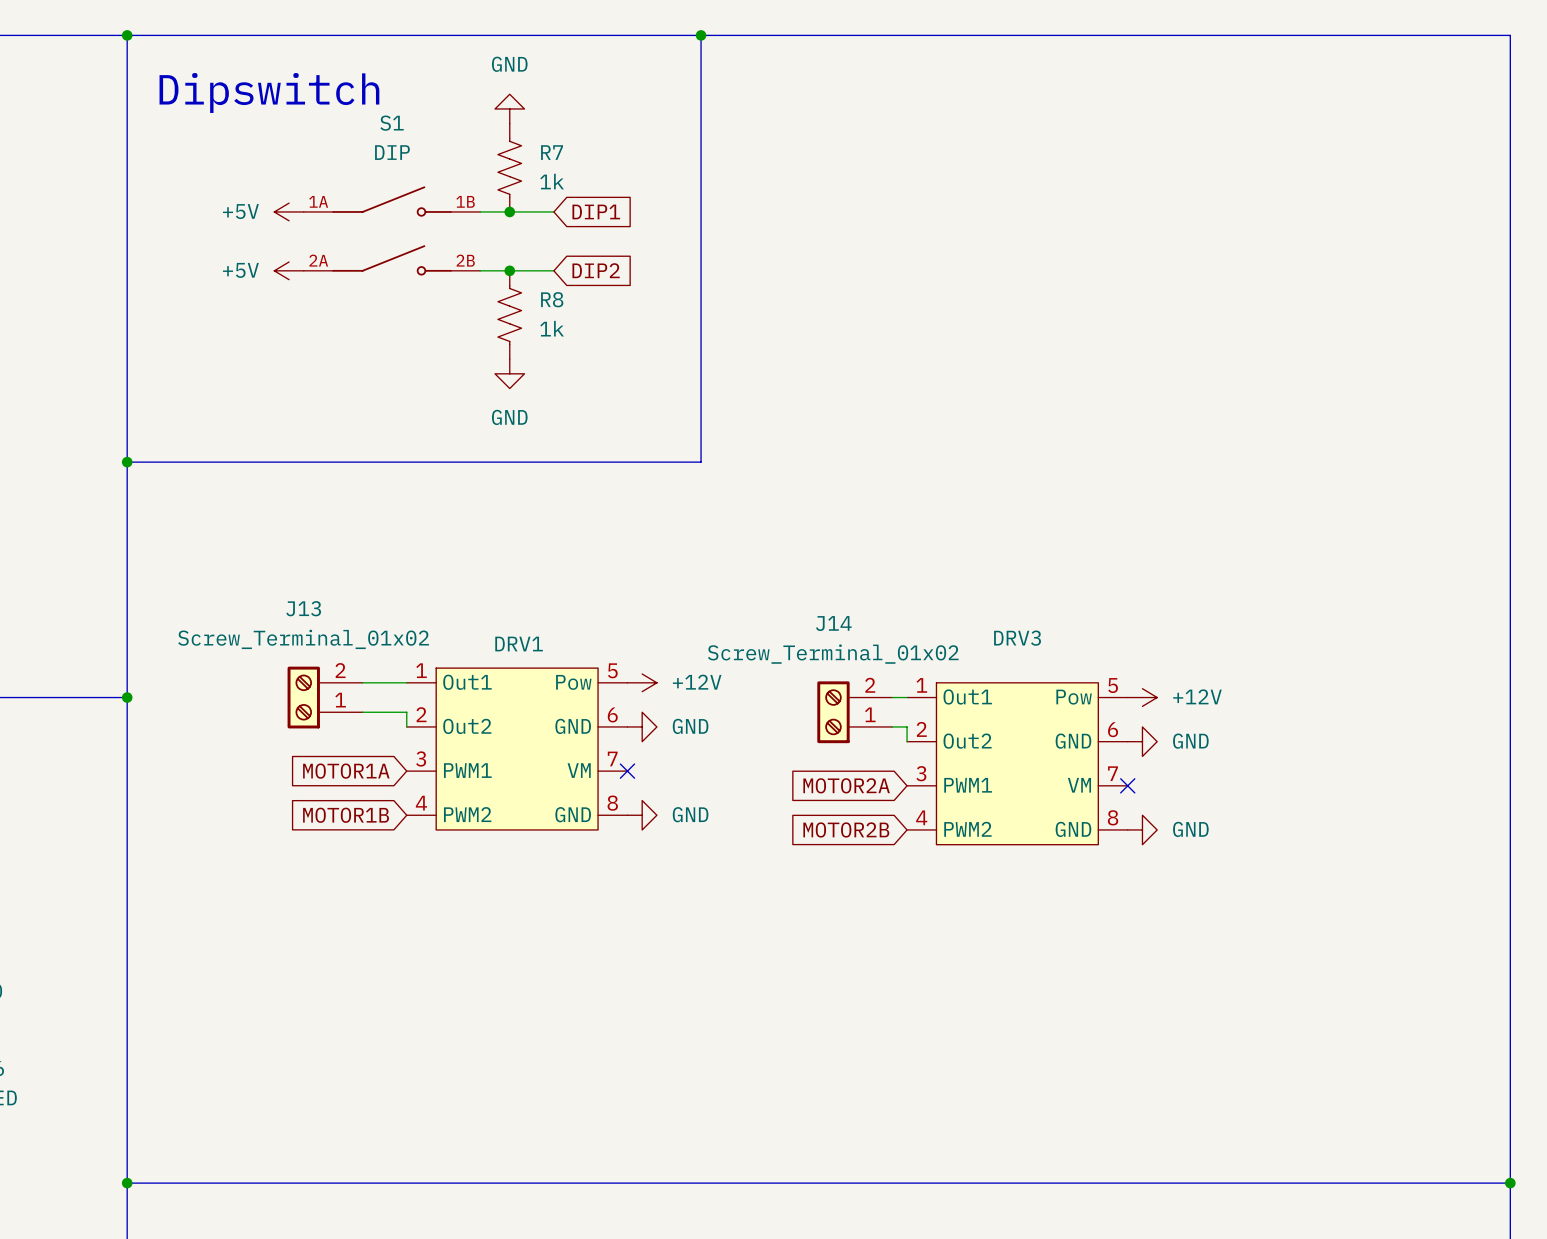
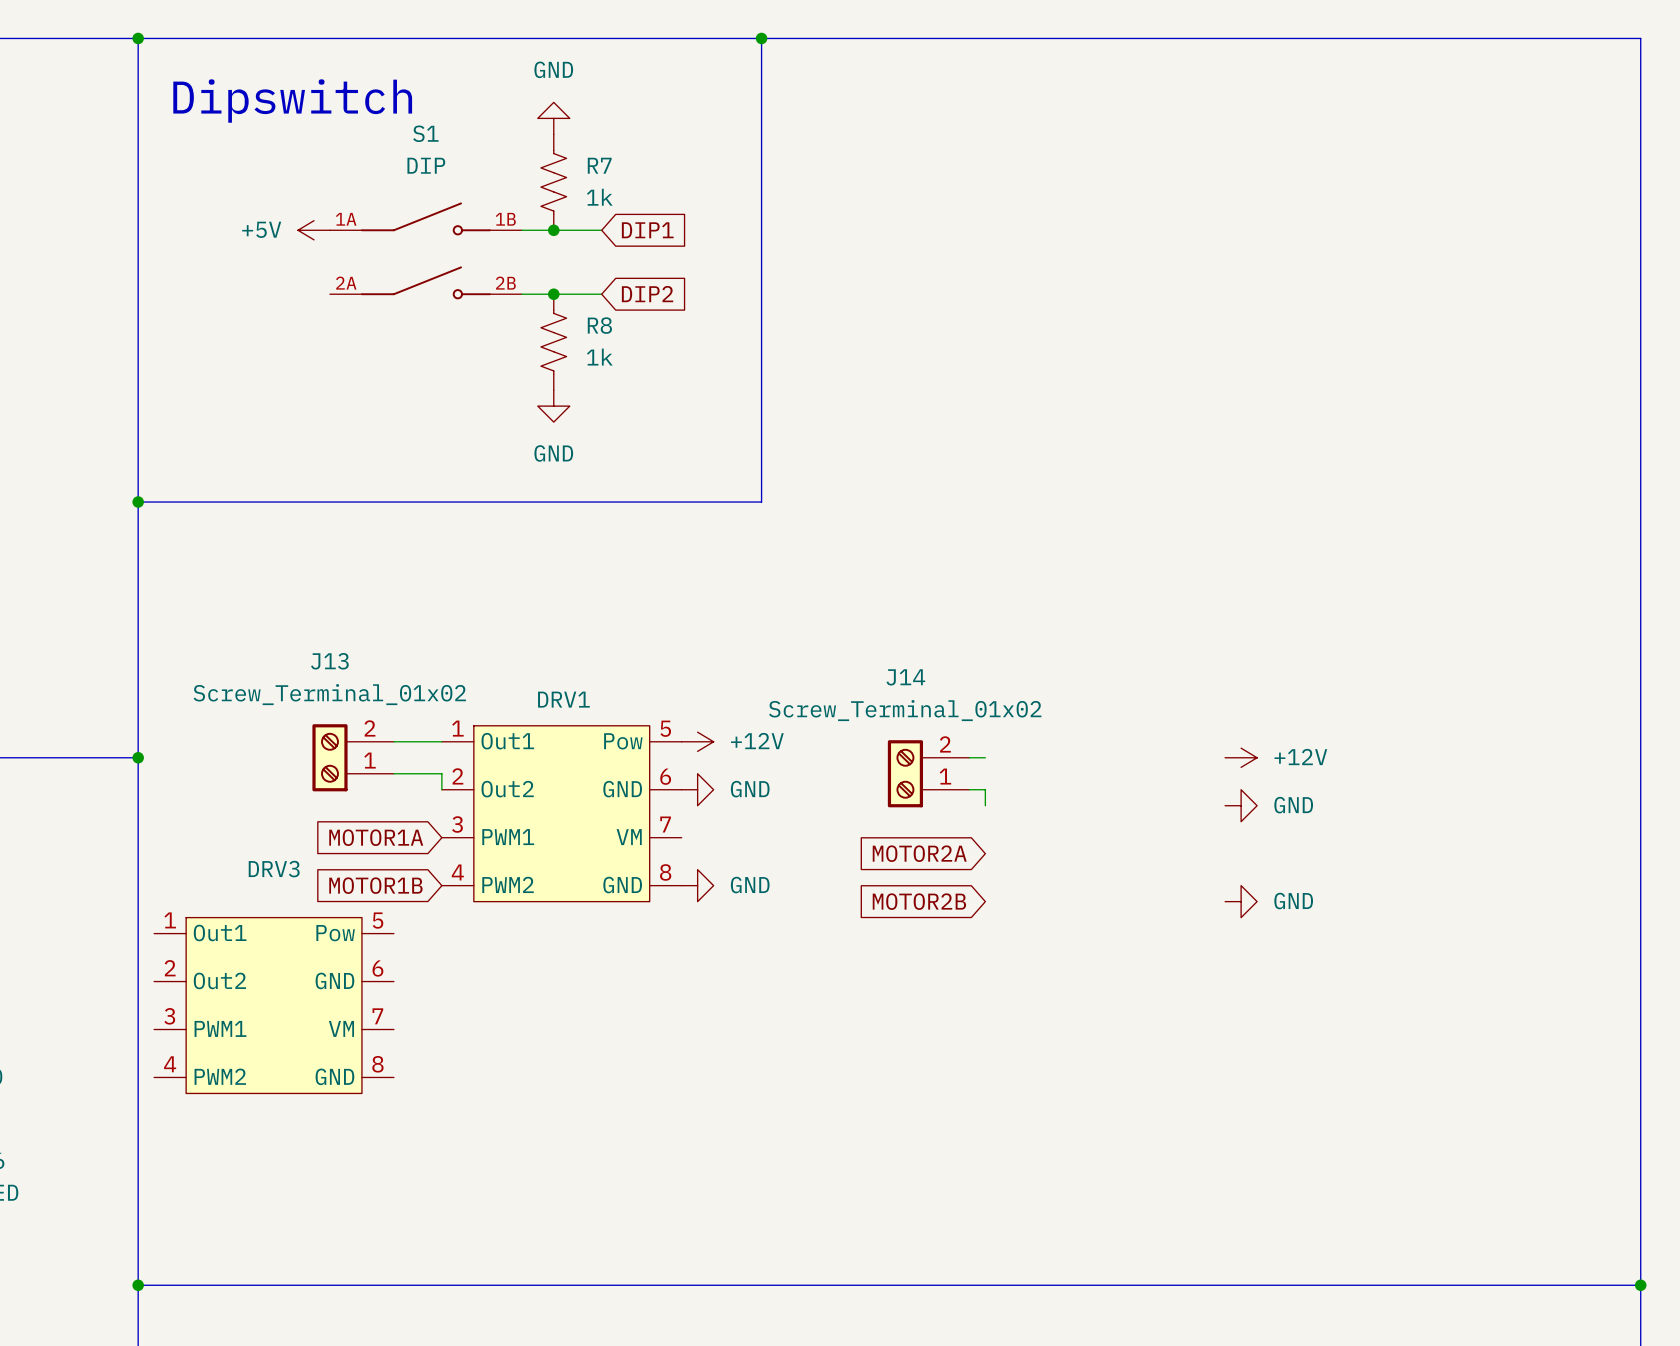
power symbol: +5V (289, 270) -> none
DRV3 position: (1017, 763) -> (274, 1005)
no-connect mark: (627, 771) -> none
no-connect mark: (1127, 785) -> none

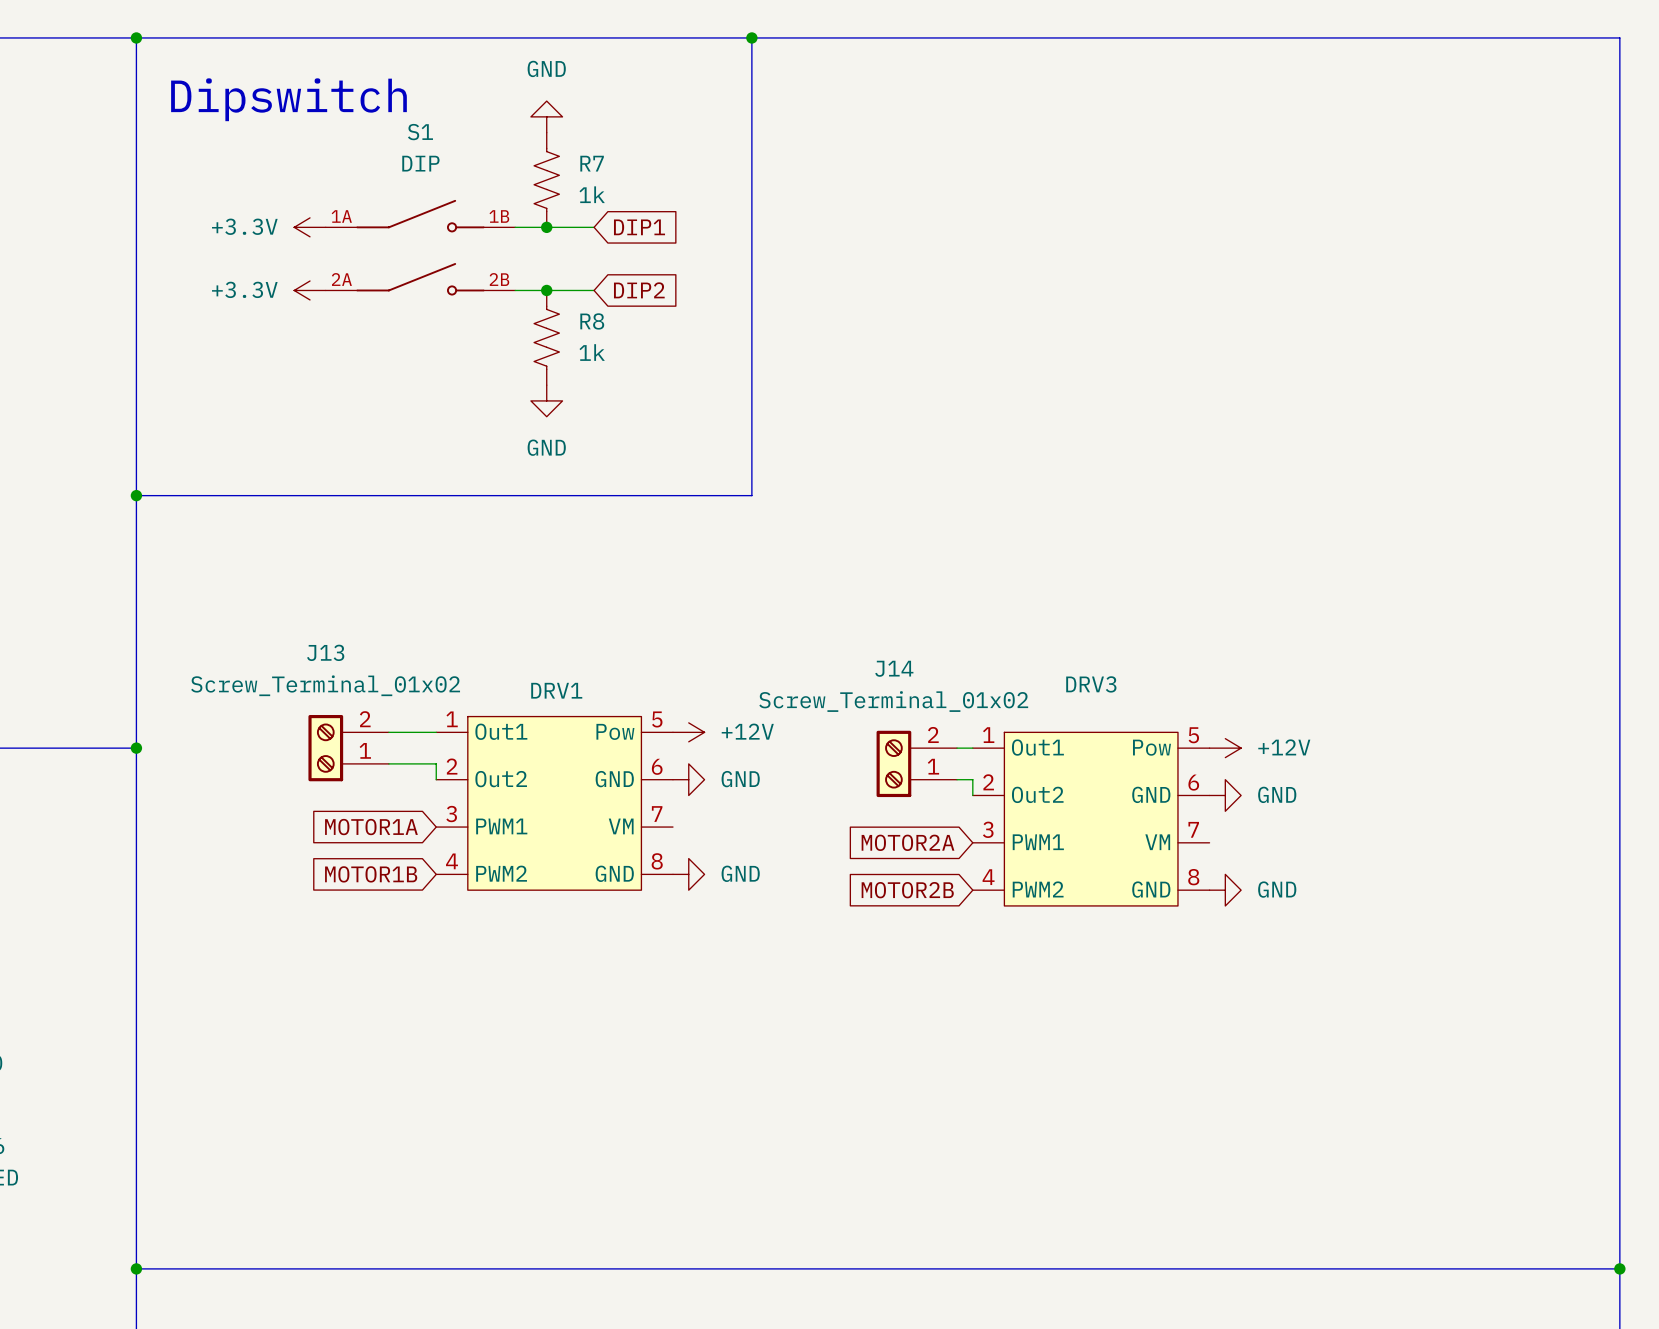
power symbol: +5V (314, 230) -> +3.3V (310, 227)
power symbol: none -> +3.3V (310, 290)
DRV3 position: (274, 1005) -> (1091, 819)

